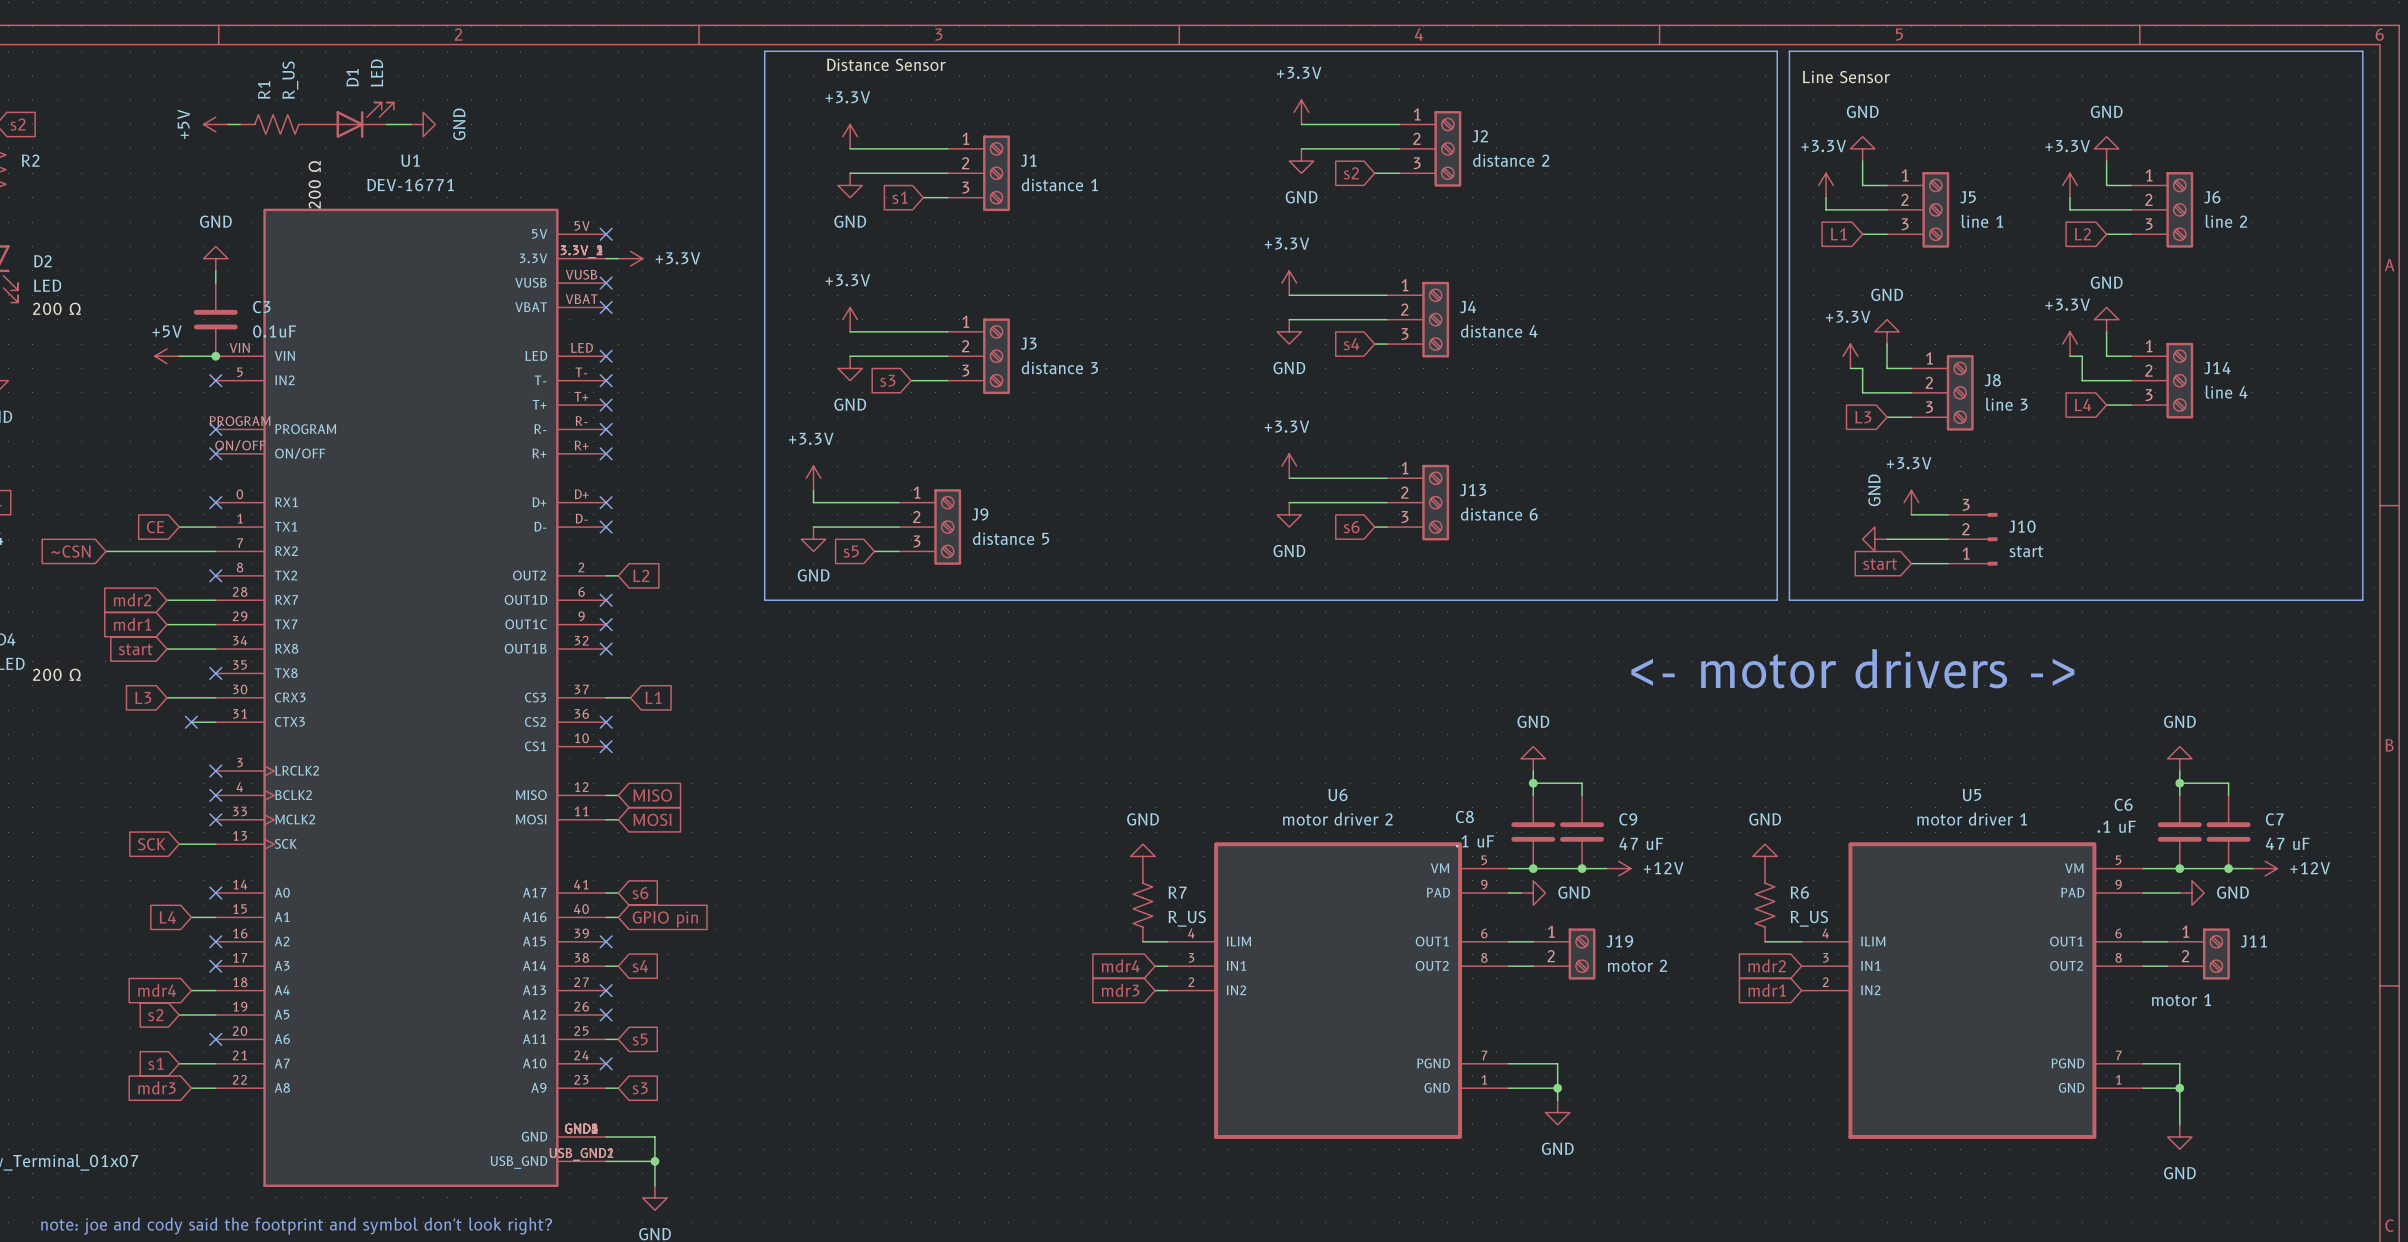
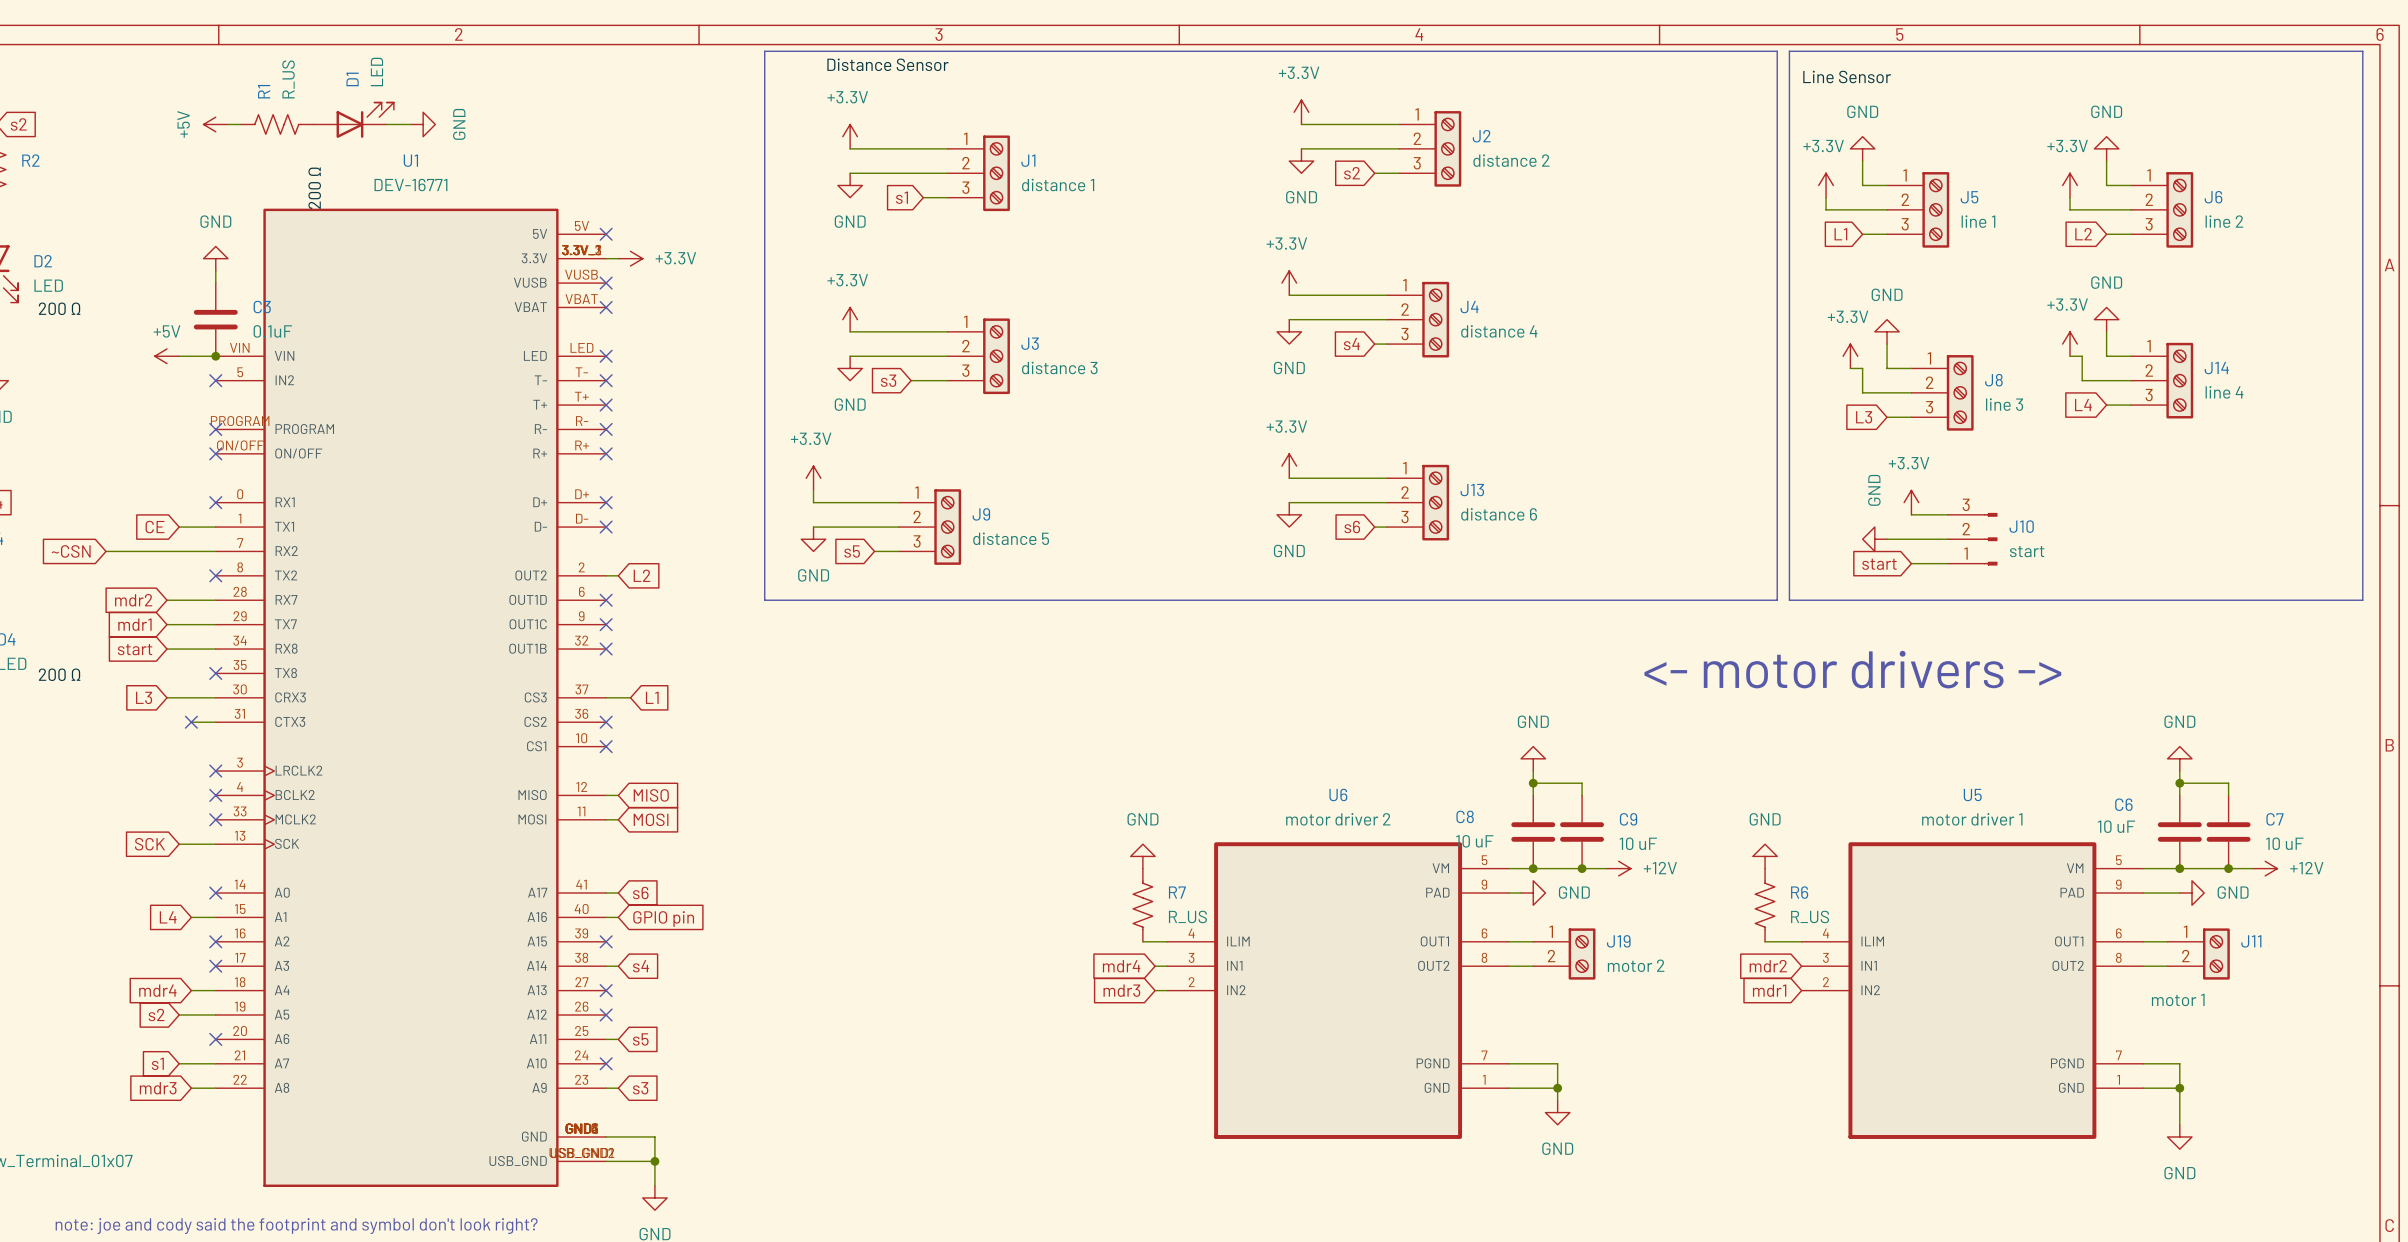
C6 value: .1 uF (2116, 826) -> 10 uF (2116, 826)
C8 value: .1 uF (1474, 841) -> 10 uF (1474, 841)
C9 value: 47 uF (1641, 843) -> 10 uF (1638, 843)
C7 value: 47 uF (2287, 843) -> 10 uF (2284, 843)

